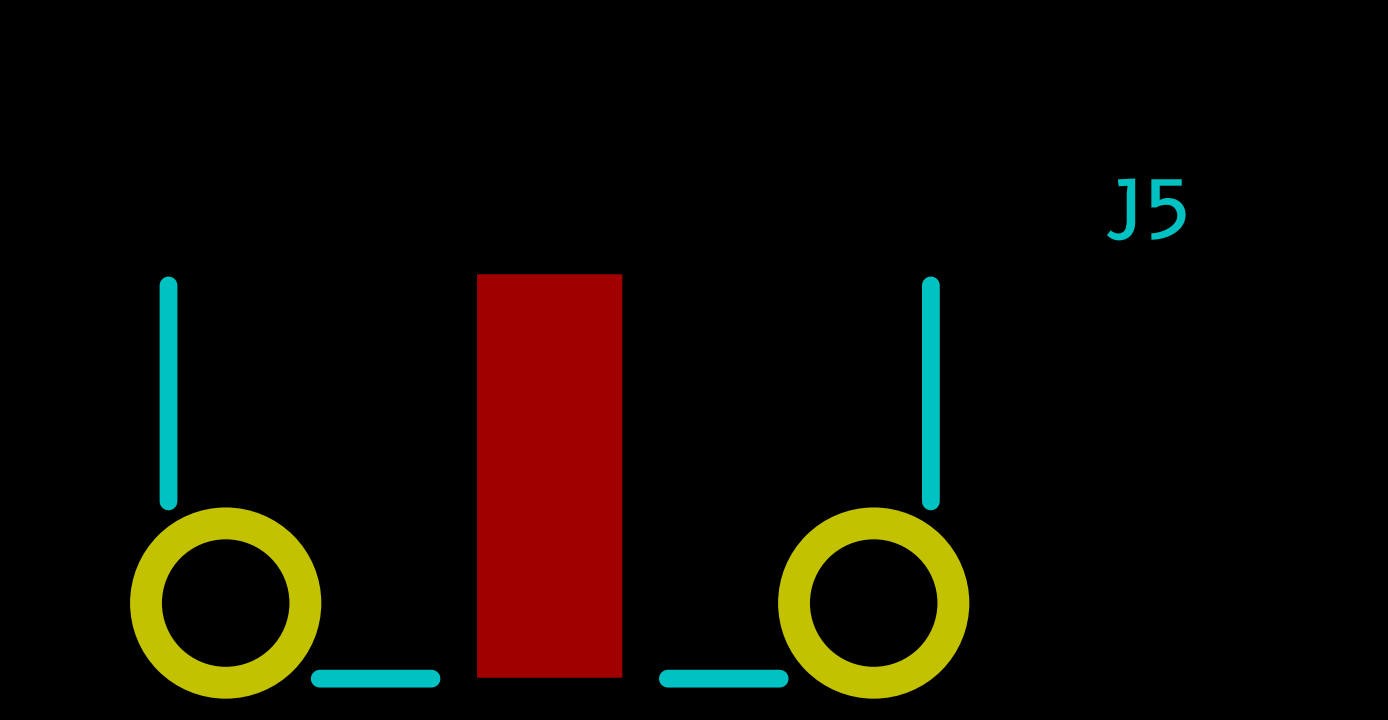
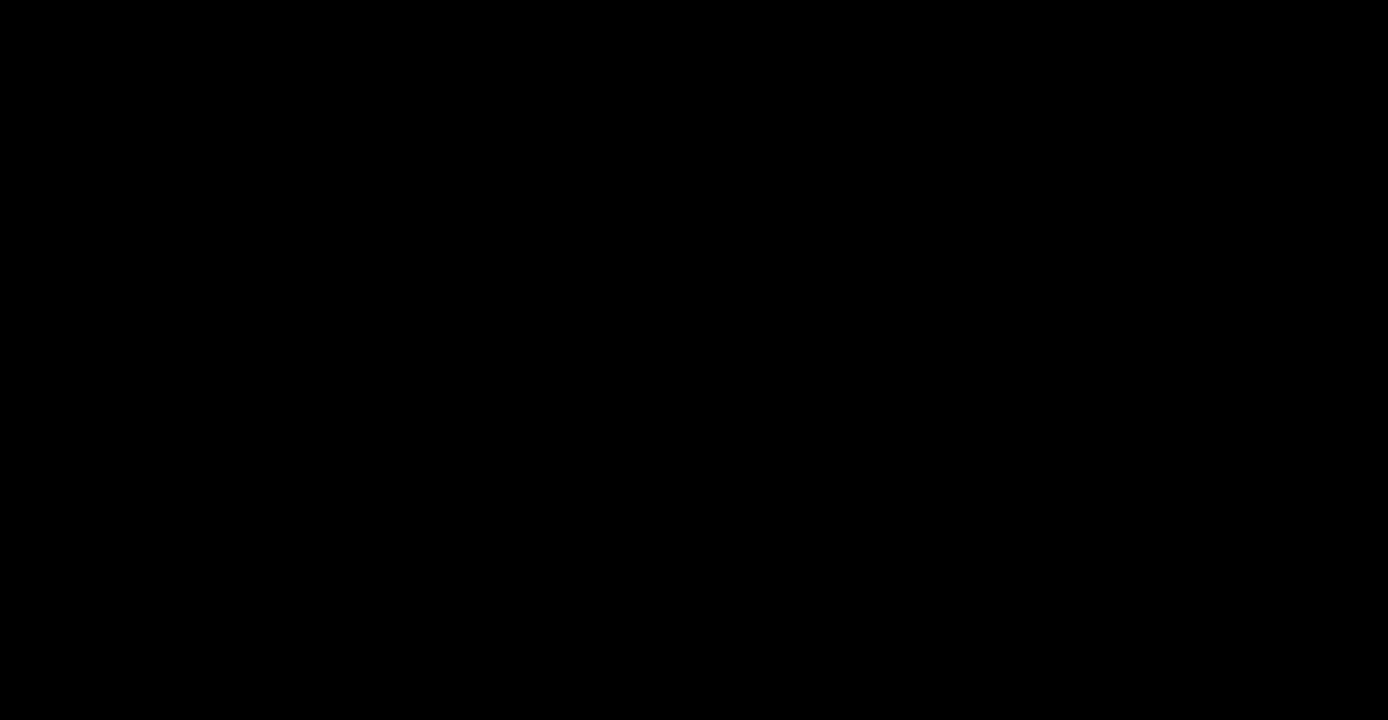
J5: (549, 486) -> none

